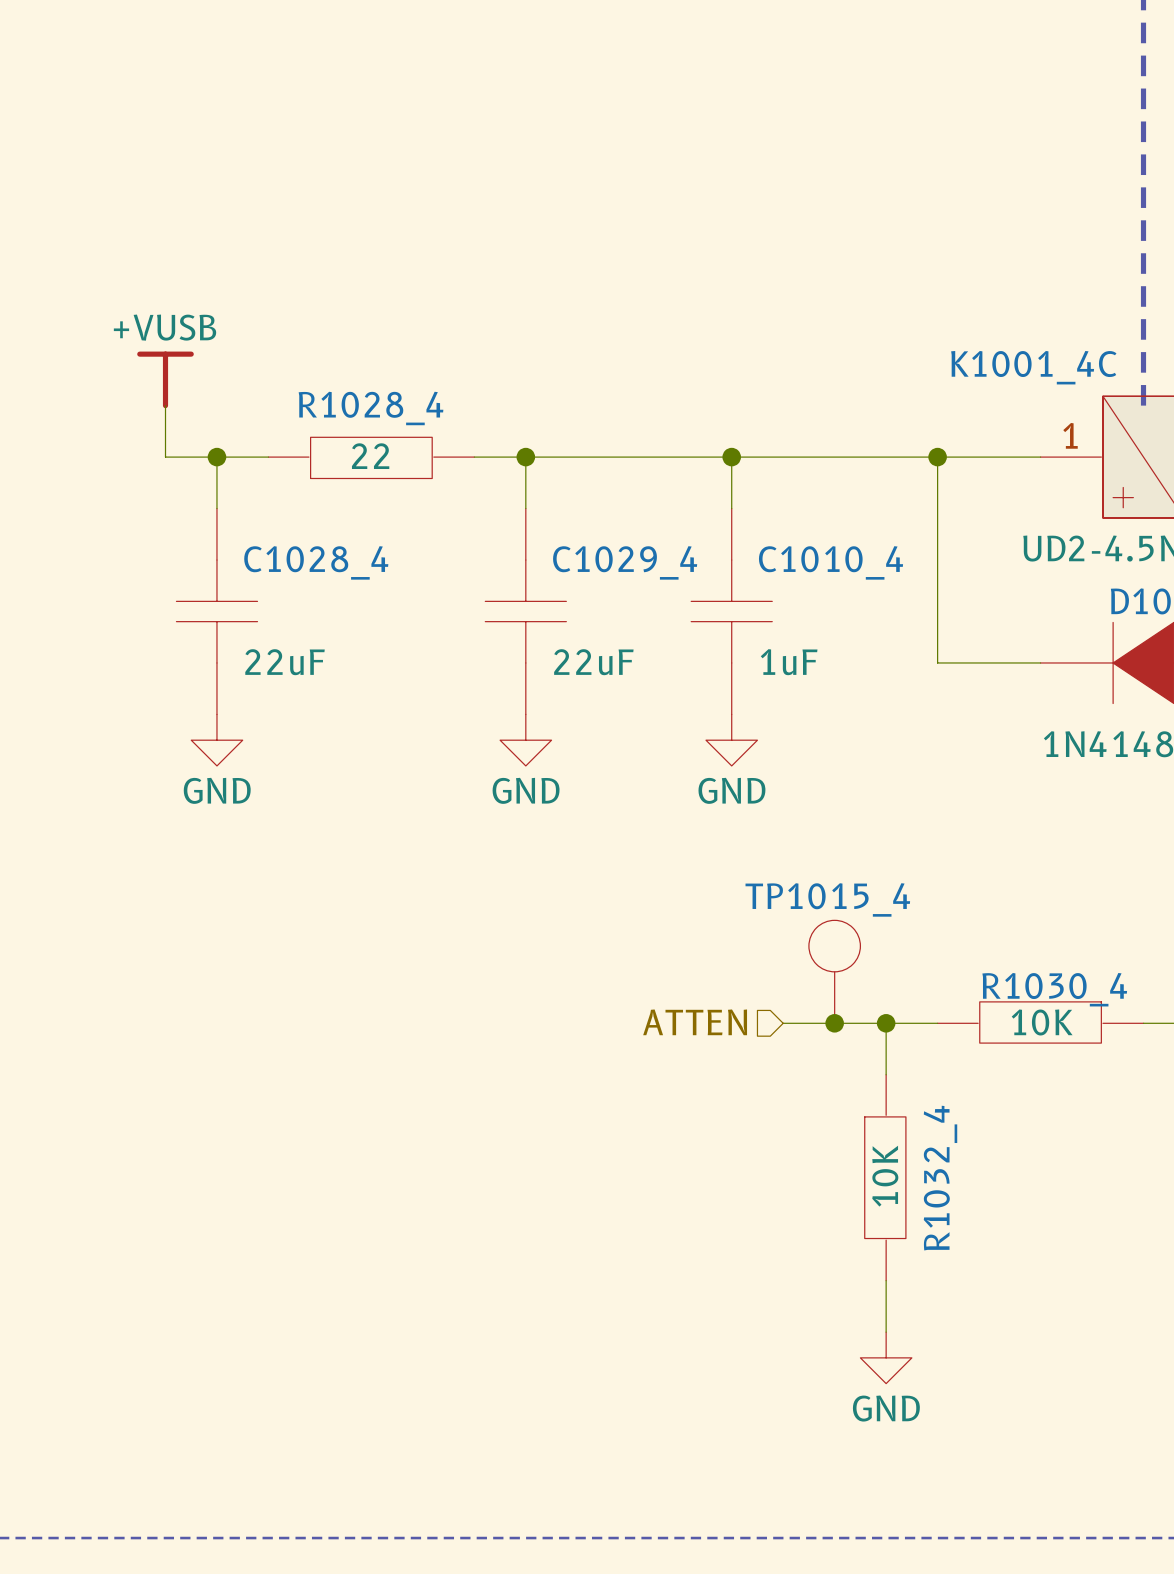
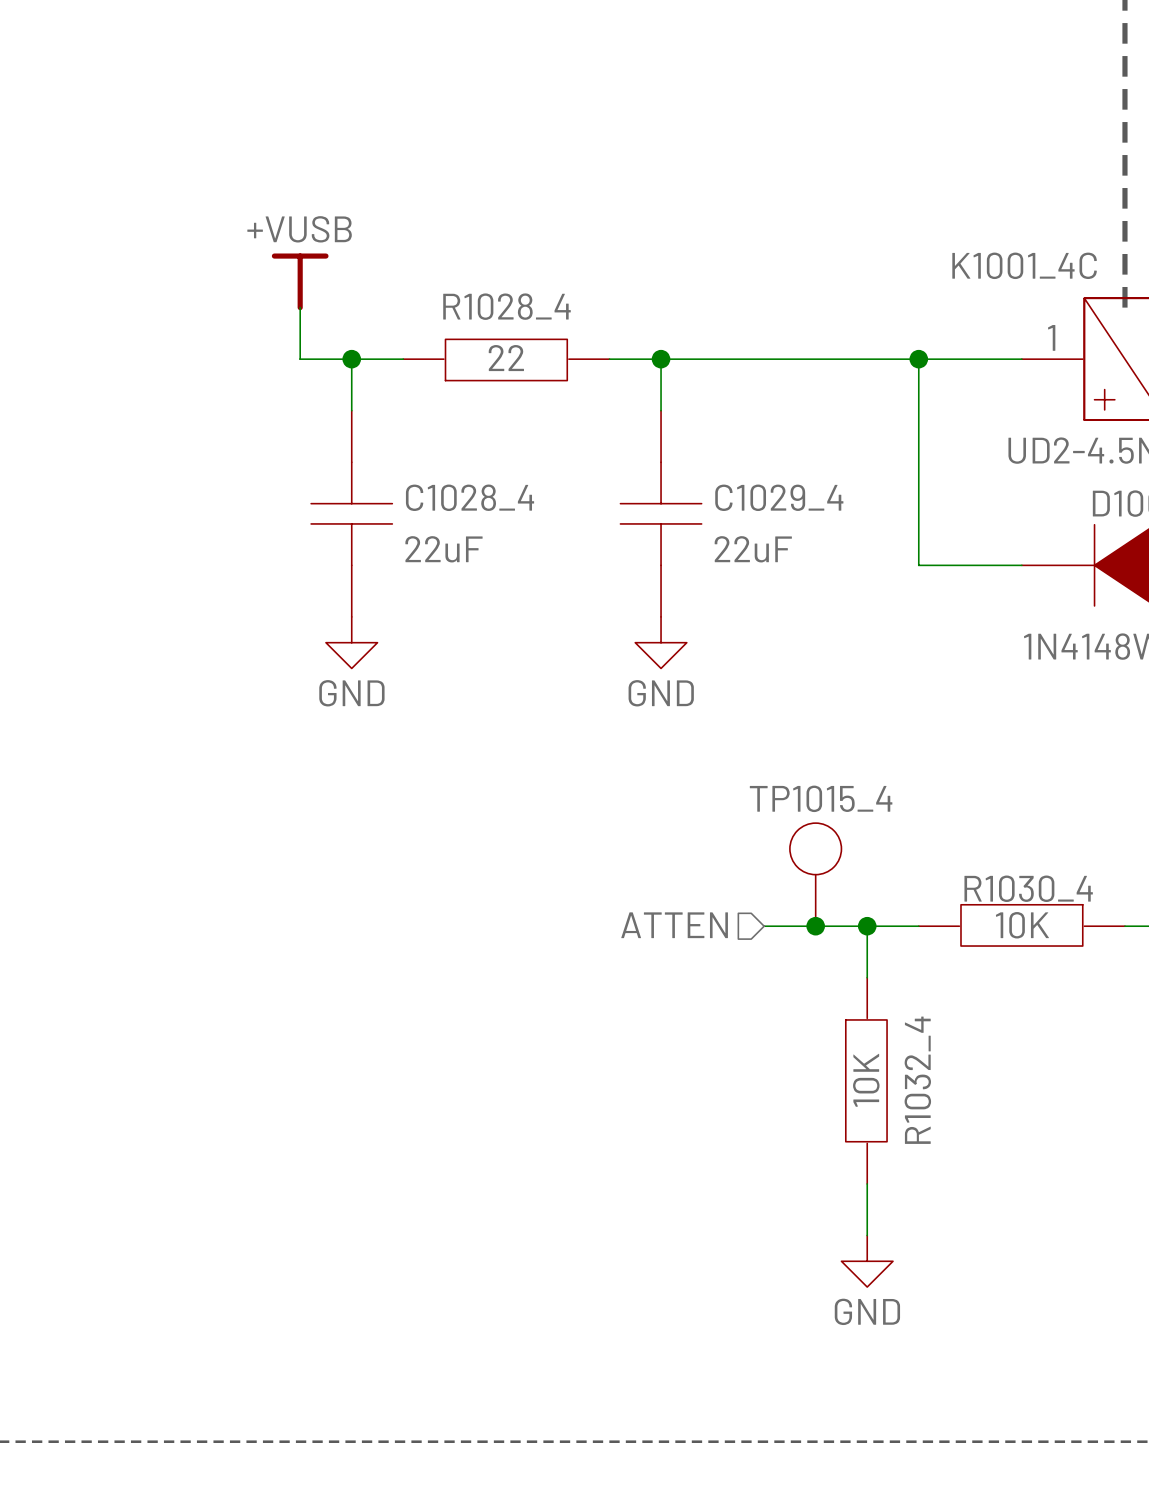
power symbol position: +VUSB (165, 379) -> +VUSB (300, 281)
wire: (165, 405) (165, 457) (268, 457) -> (300, 307) (300, 359) (403, 359)
wire: (216, 457) (216, 508) -> (351, 359) (351, 410)
junction: (216, 457) -> none
junction: none -> (351, 359)
R1028_4 position: (371, 457) -> (506, 359)
wire: (474, 457) (628, 457) -> none
wire: (525, 457) (525, 508) -> (661, 359) (661, 410)
junction: (525, 457) -> none
wire: (731, 457) (731, 508) -> none
junction position: (731, 457) -> (661, 359)
C1028_4 name position: C1028_4 (316, 562) -> C1028_4 (470, 497)
C1029_4 name position: C1029_4 (625, 562) -> C1029_4 (779, 497)
C1028_4 position: (216, 611) -> (351, 513)
C1029_4 position: (525, 611) -> (661, 513)
C1010_4: 1uF (731, 611) -> none
C1028_4 value position: 22uF (285, 662) -> 22uF (443, 549)
C1029_4 value position: 22uF (593, 662) -> 22uF (753, 549)
power symbol: GND (216, 740) -> none
power symbol: none -> GND (351, 642)
power symbol: GND (525, 740) -> none
power symbol position: GND (731, 740) -> GND (661, 642)

